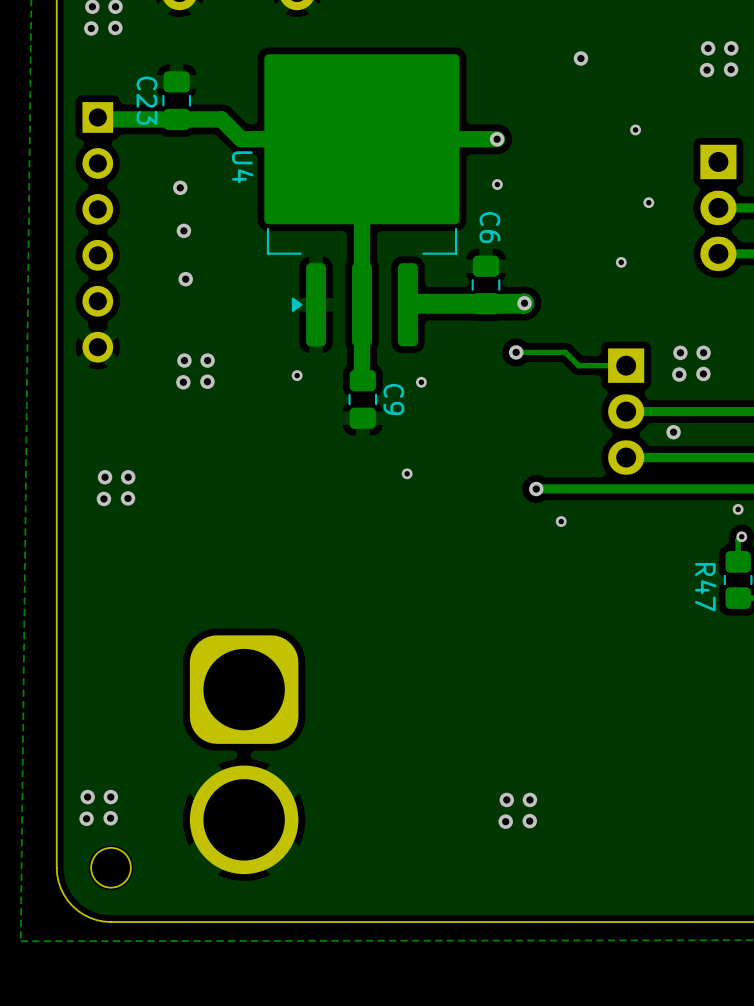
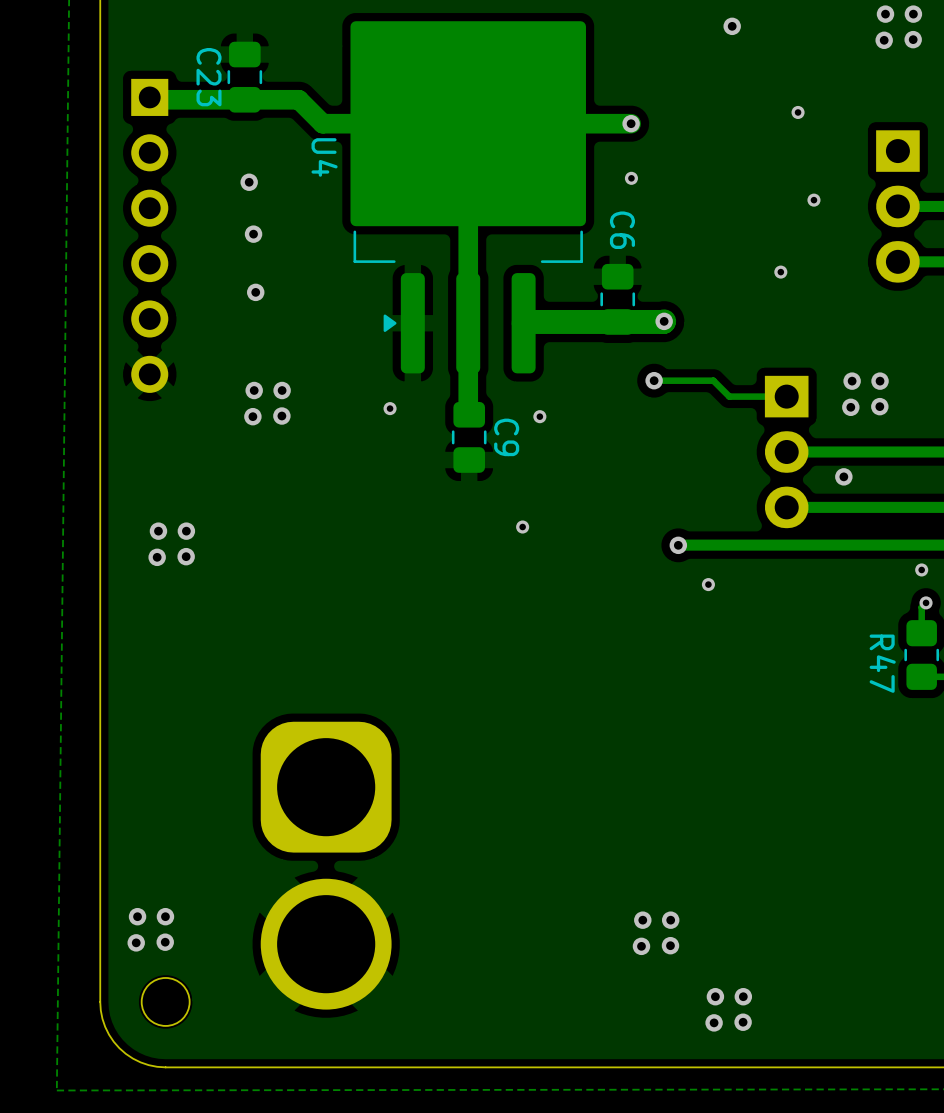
via: none -> (715, 996)
via: none -> (743, 996)
via: none -> (743, 1022)
via: none -> (714, 1022)

